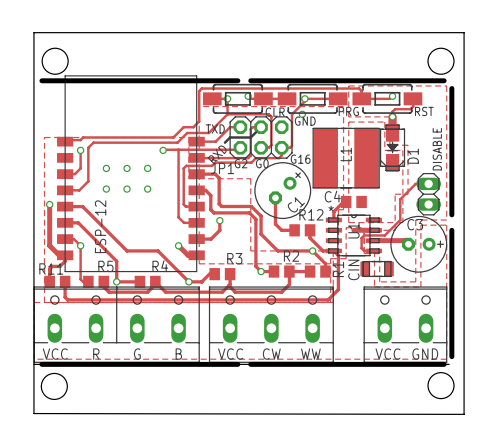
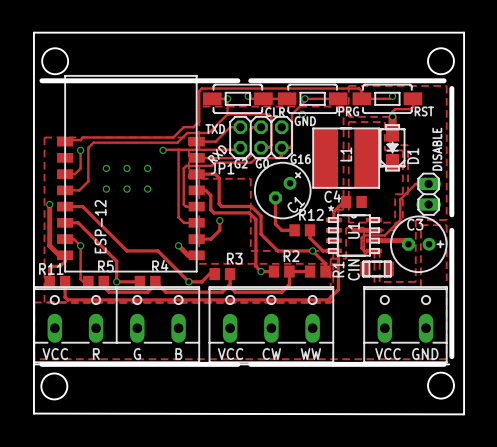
line: (255, 132) (250, 137) (230, 137) (224, 142) -> none

